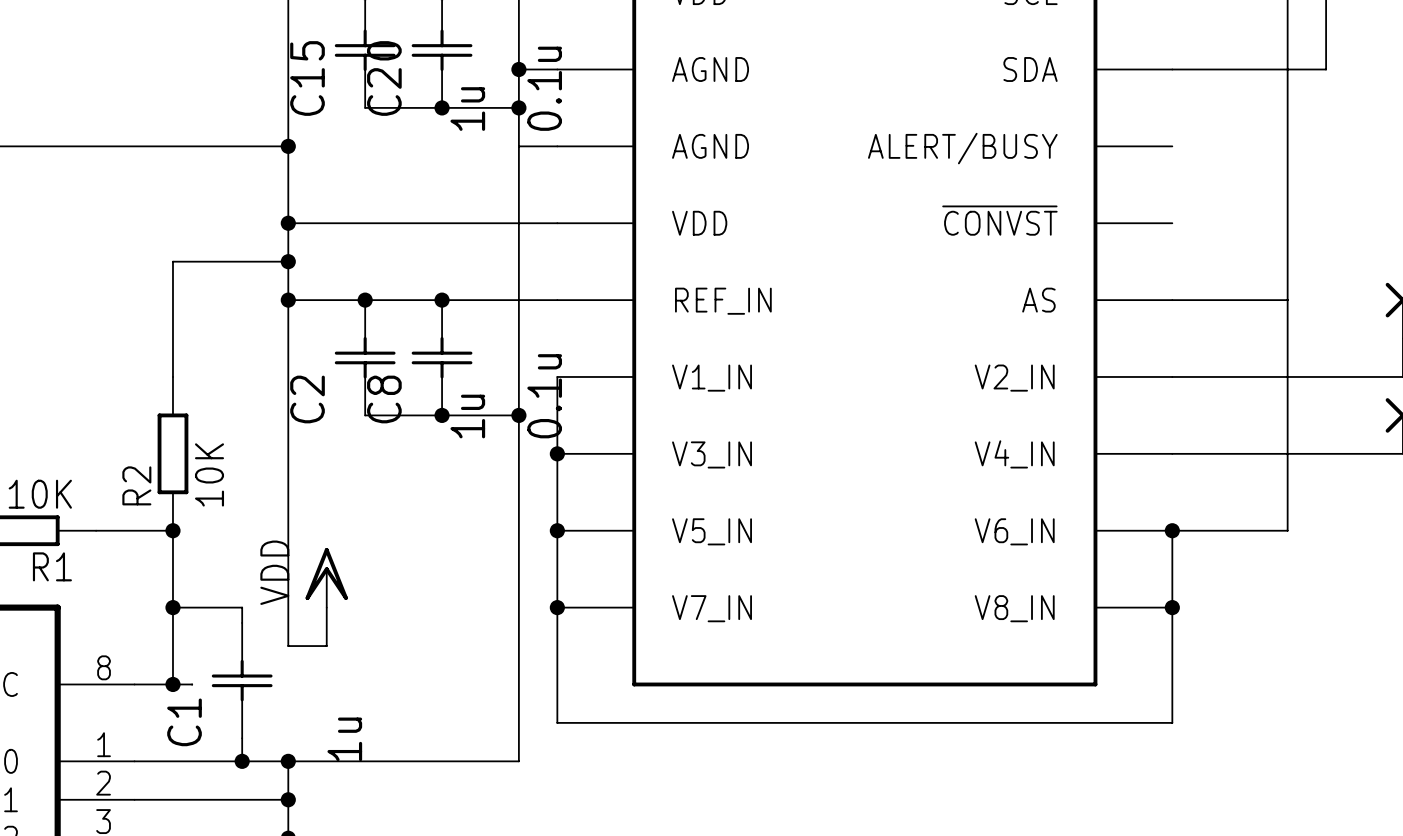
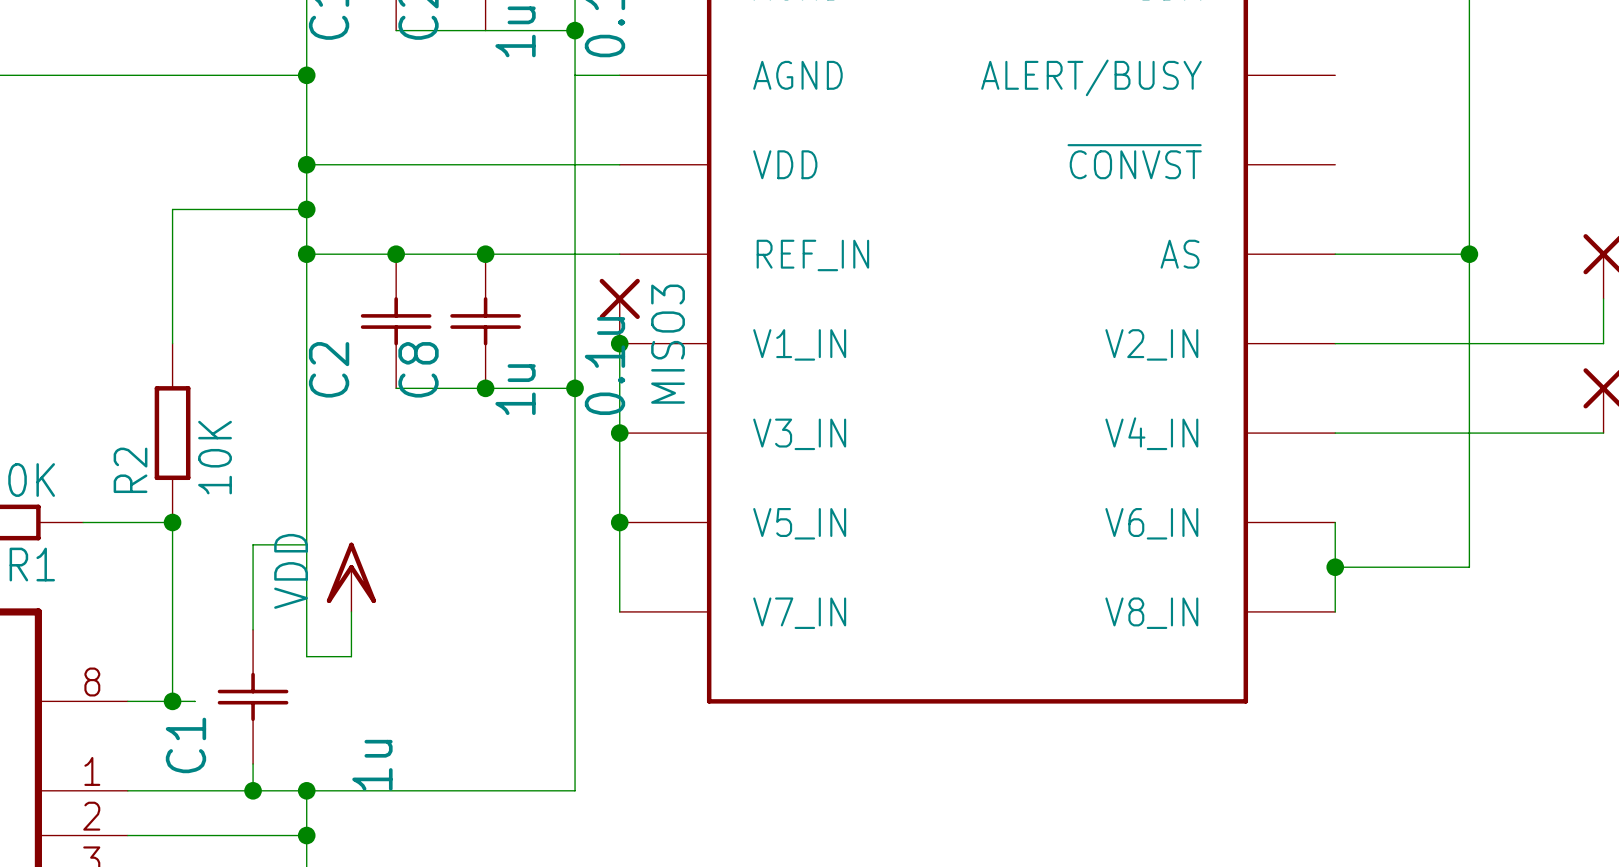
junction: (442, 107) -> none
junction: none -> (1469, 254)
MISO3: none -> (619, 311)
junction: none -> (619, 343)
wire: (1172, 530) (1287, 530) -> (1335, 567) (1469, 567) (1469, 522)
junction: (1172, 530) -> none
junction: none -> (1335, 567)
wire: (172, 607) (242, 607) -> (306, 544) (253, 544) (253, 611)
junction: (172, 607) -> none
wire: (557, 607) (557, 722) (1172, 722) (1172, 607) -> none
junction: (557, 607) -> none
junction: (1172, 607) -> none

